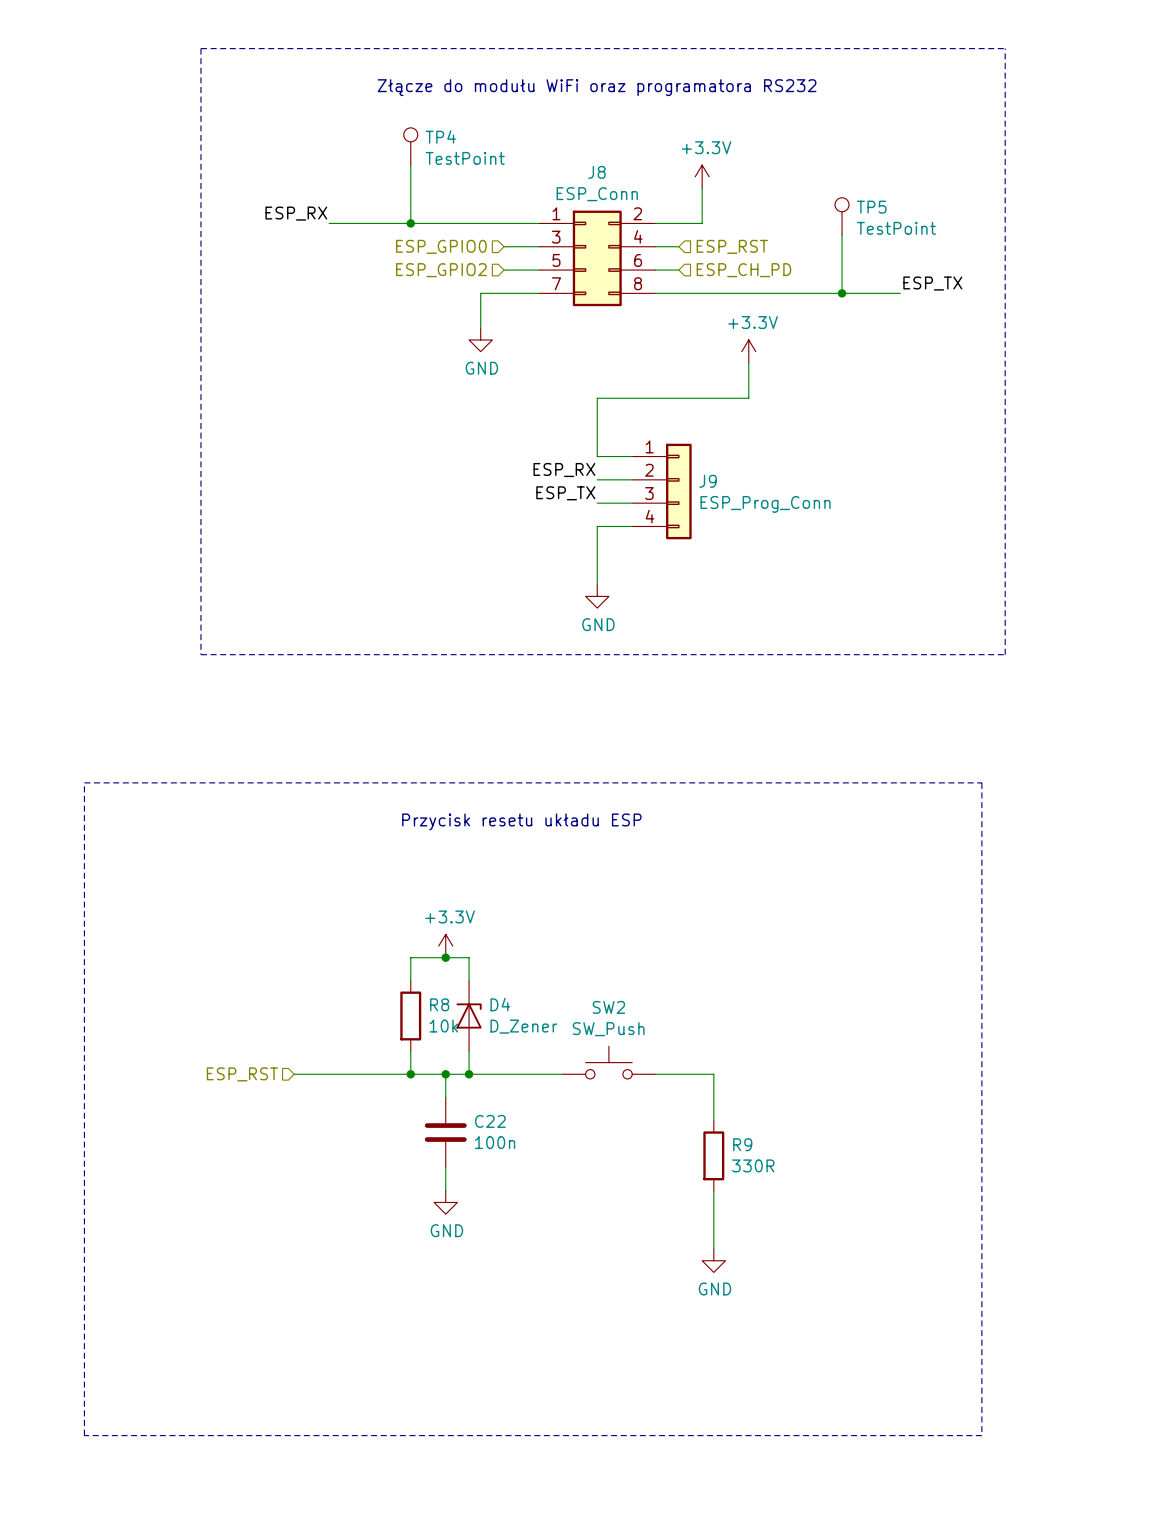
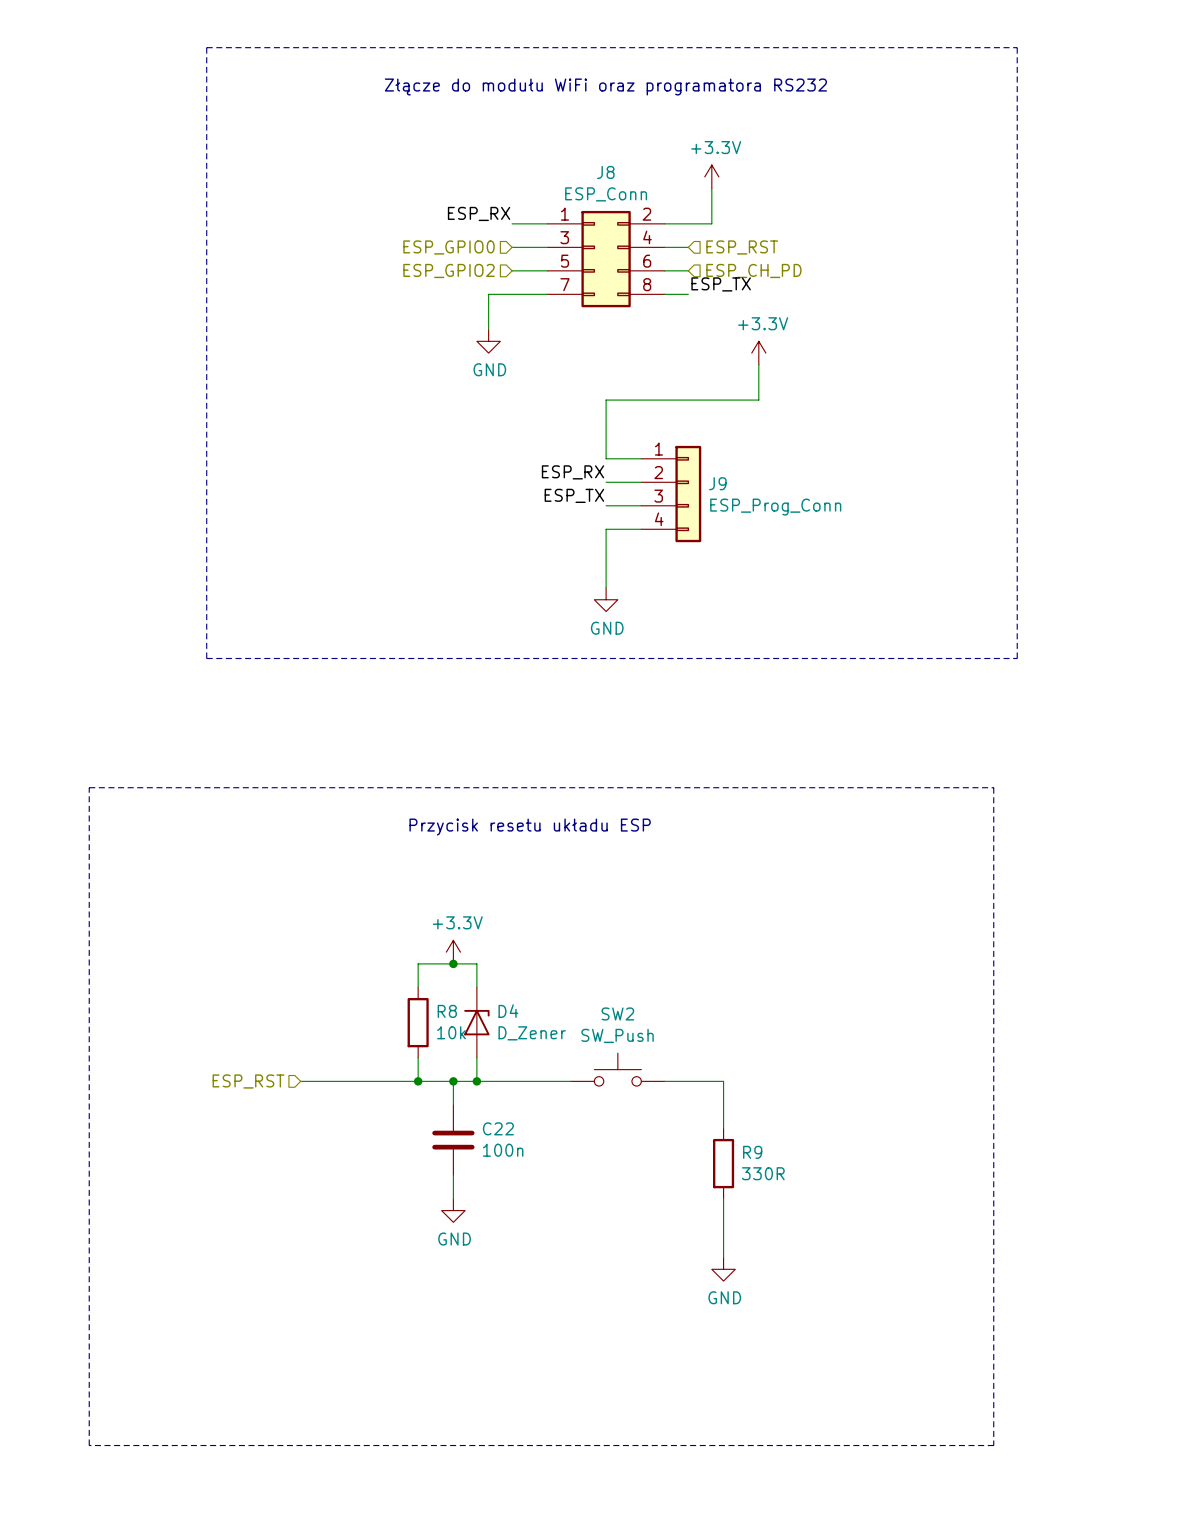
TP4: TestPoint (410, 146) -> none
wire: (410, 165) (410, 223) -> none
label position: ESP_RX (296, 213) -> ESP_RX (479, 213)
TP5: TestPoint (842, 216) -> none
wire: (329, 223) (504, 223) -> none
junction: (410, 223) -> none
wire: (842, 235) (842, 293) -> none
label position: ESP_TX (932, 283) -> ESP_TX (721, 284)
wire: (678, 293) (900, 293) -> none
junction: (842, 293) -> none

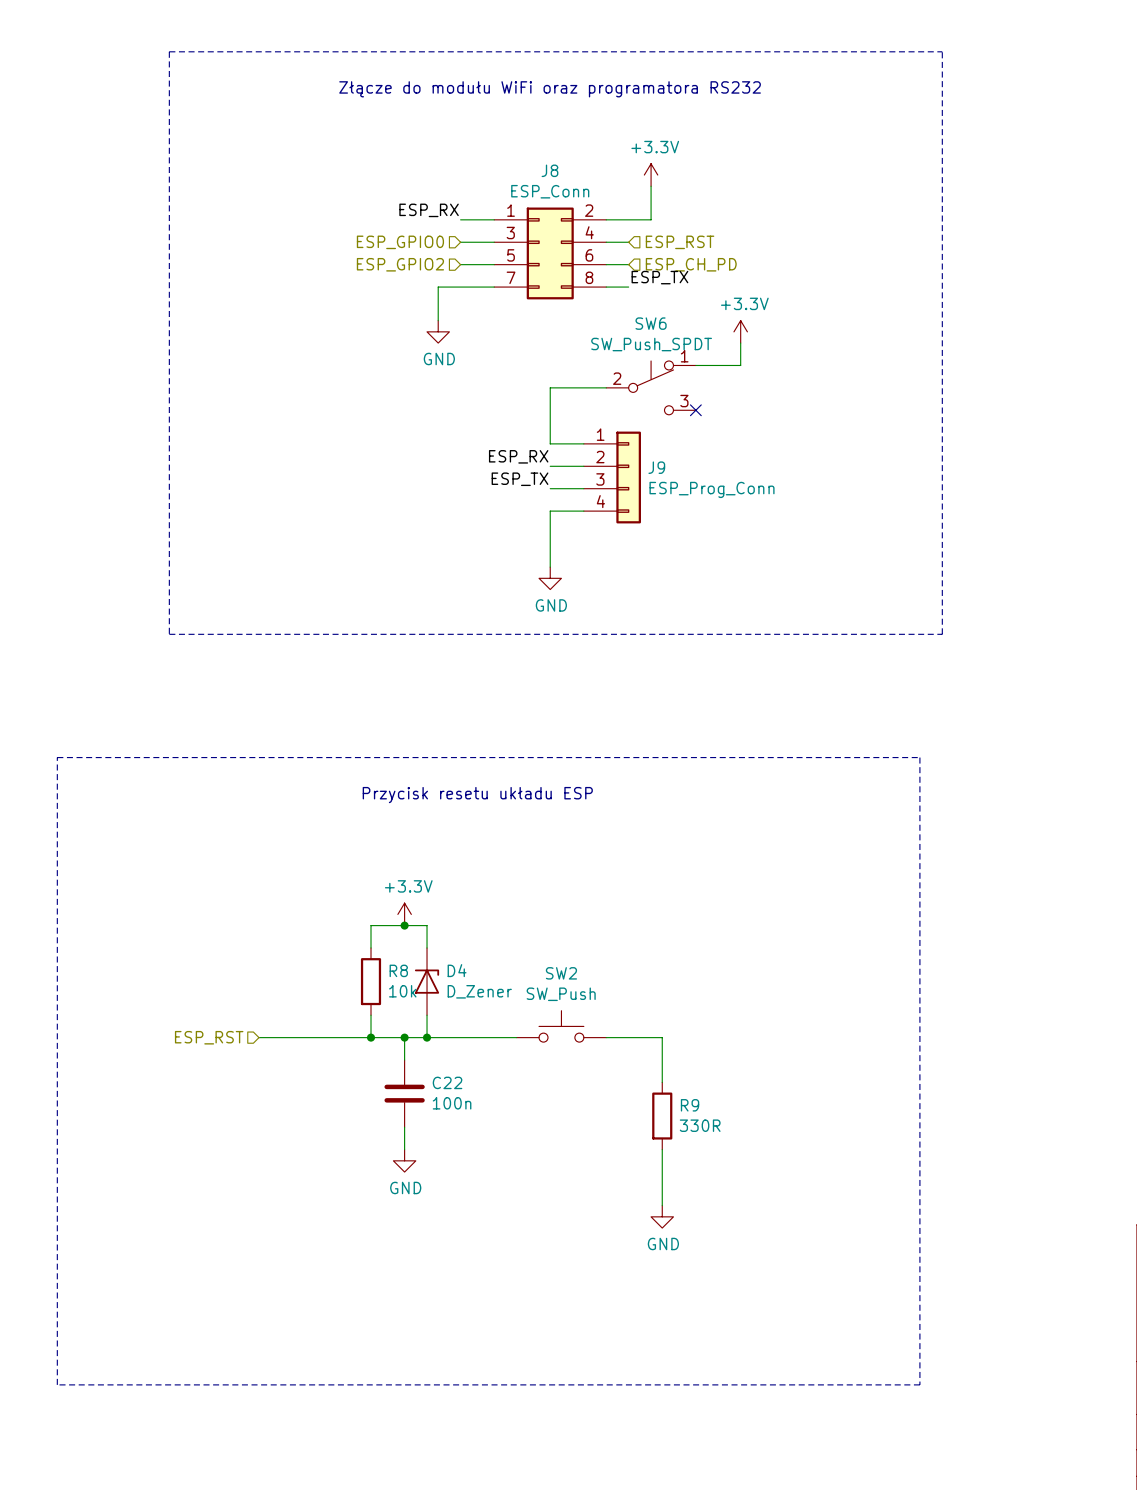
power symbol position: +3.3V (758, 353) -> +3.3V (740, 331)
wire: none -> (740, 343) (740, 365) (695, 365)
wire: (758, 364) (758, 400) (664, 400) -> none
SW6: none -> SW_Push_SPDT (651, 387)
no-connect mark: none -> (695, 410)

